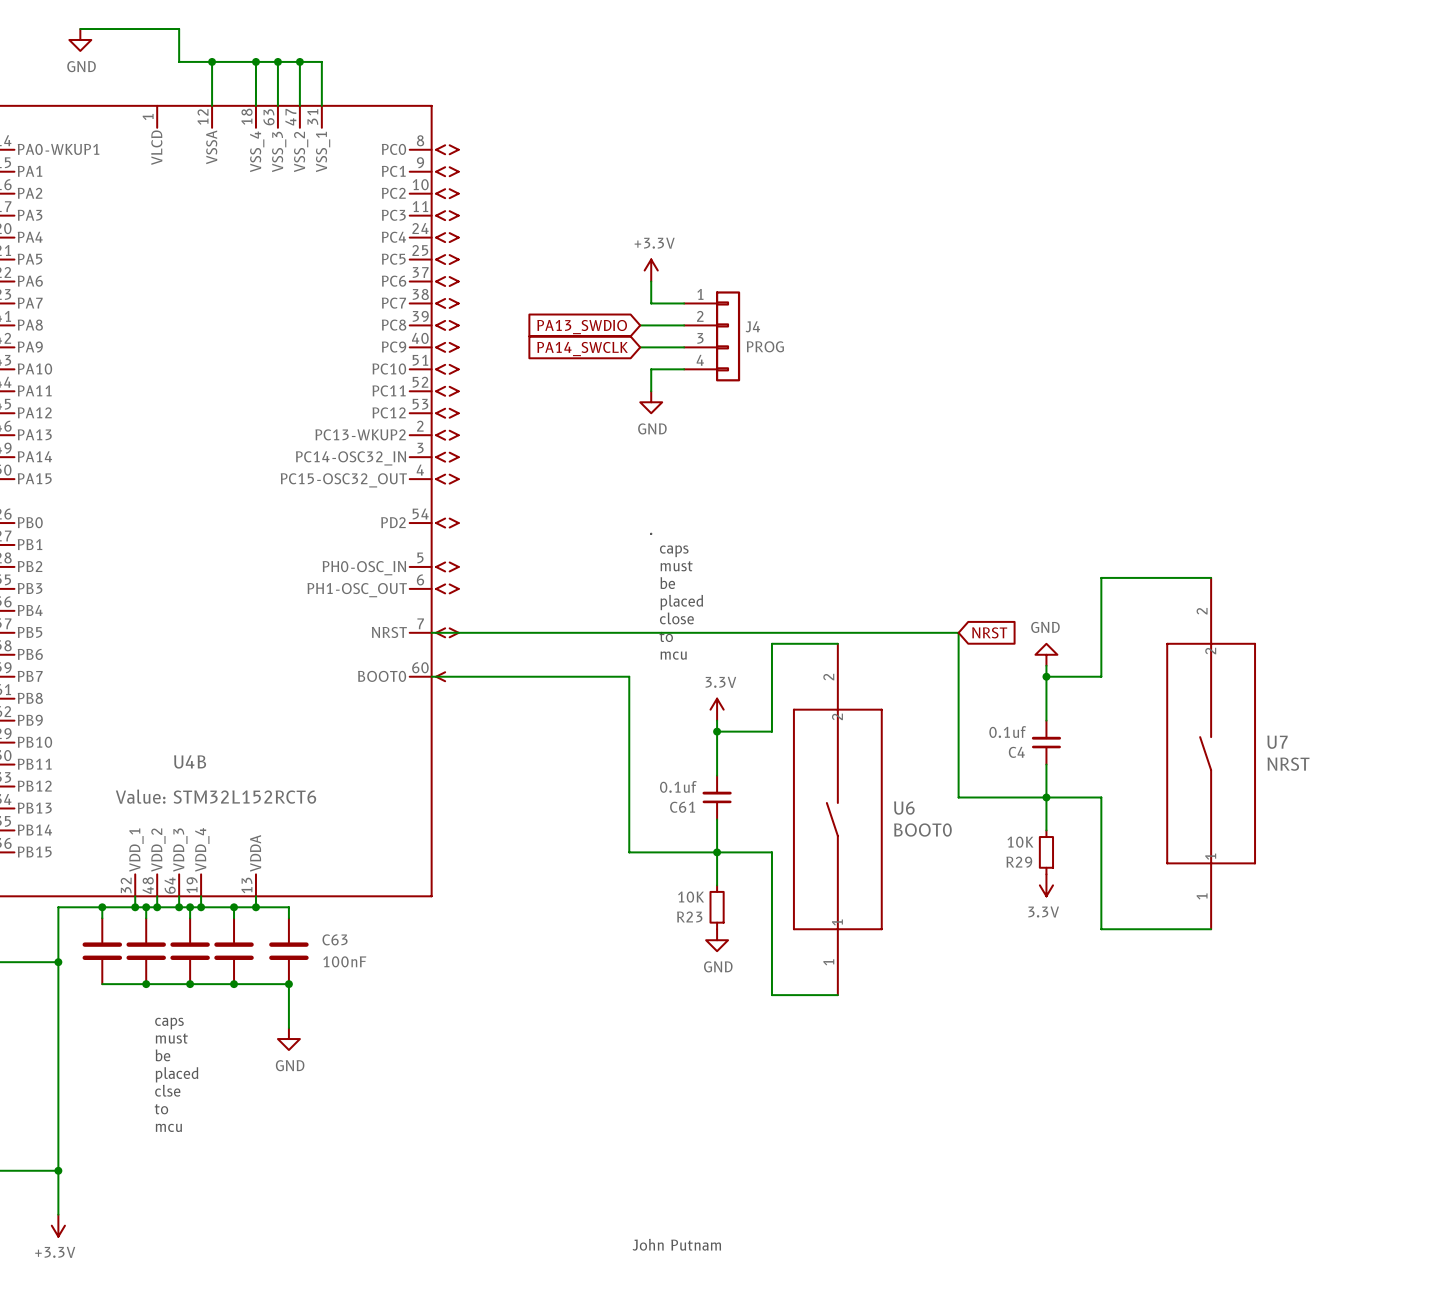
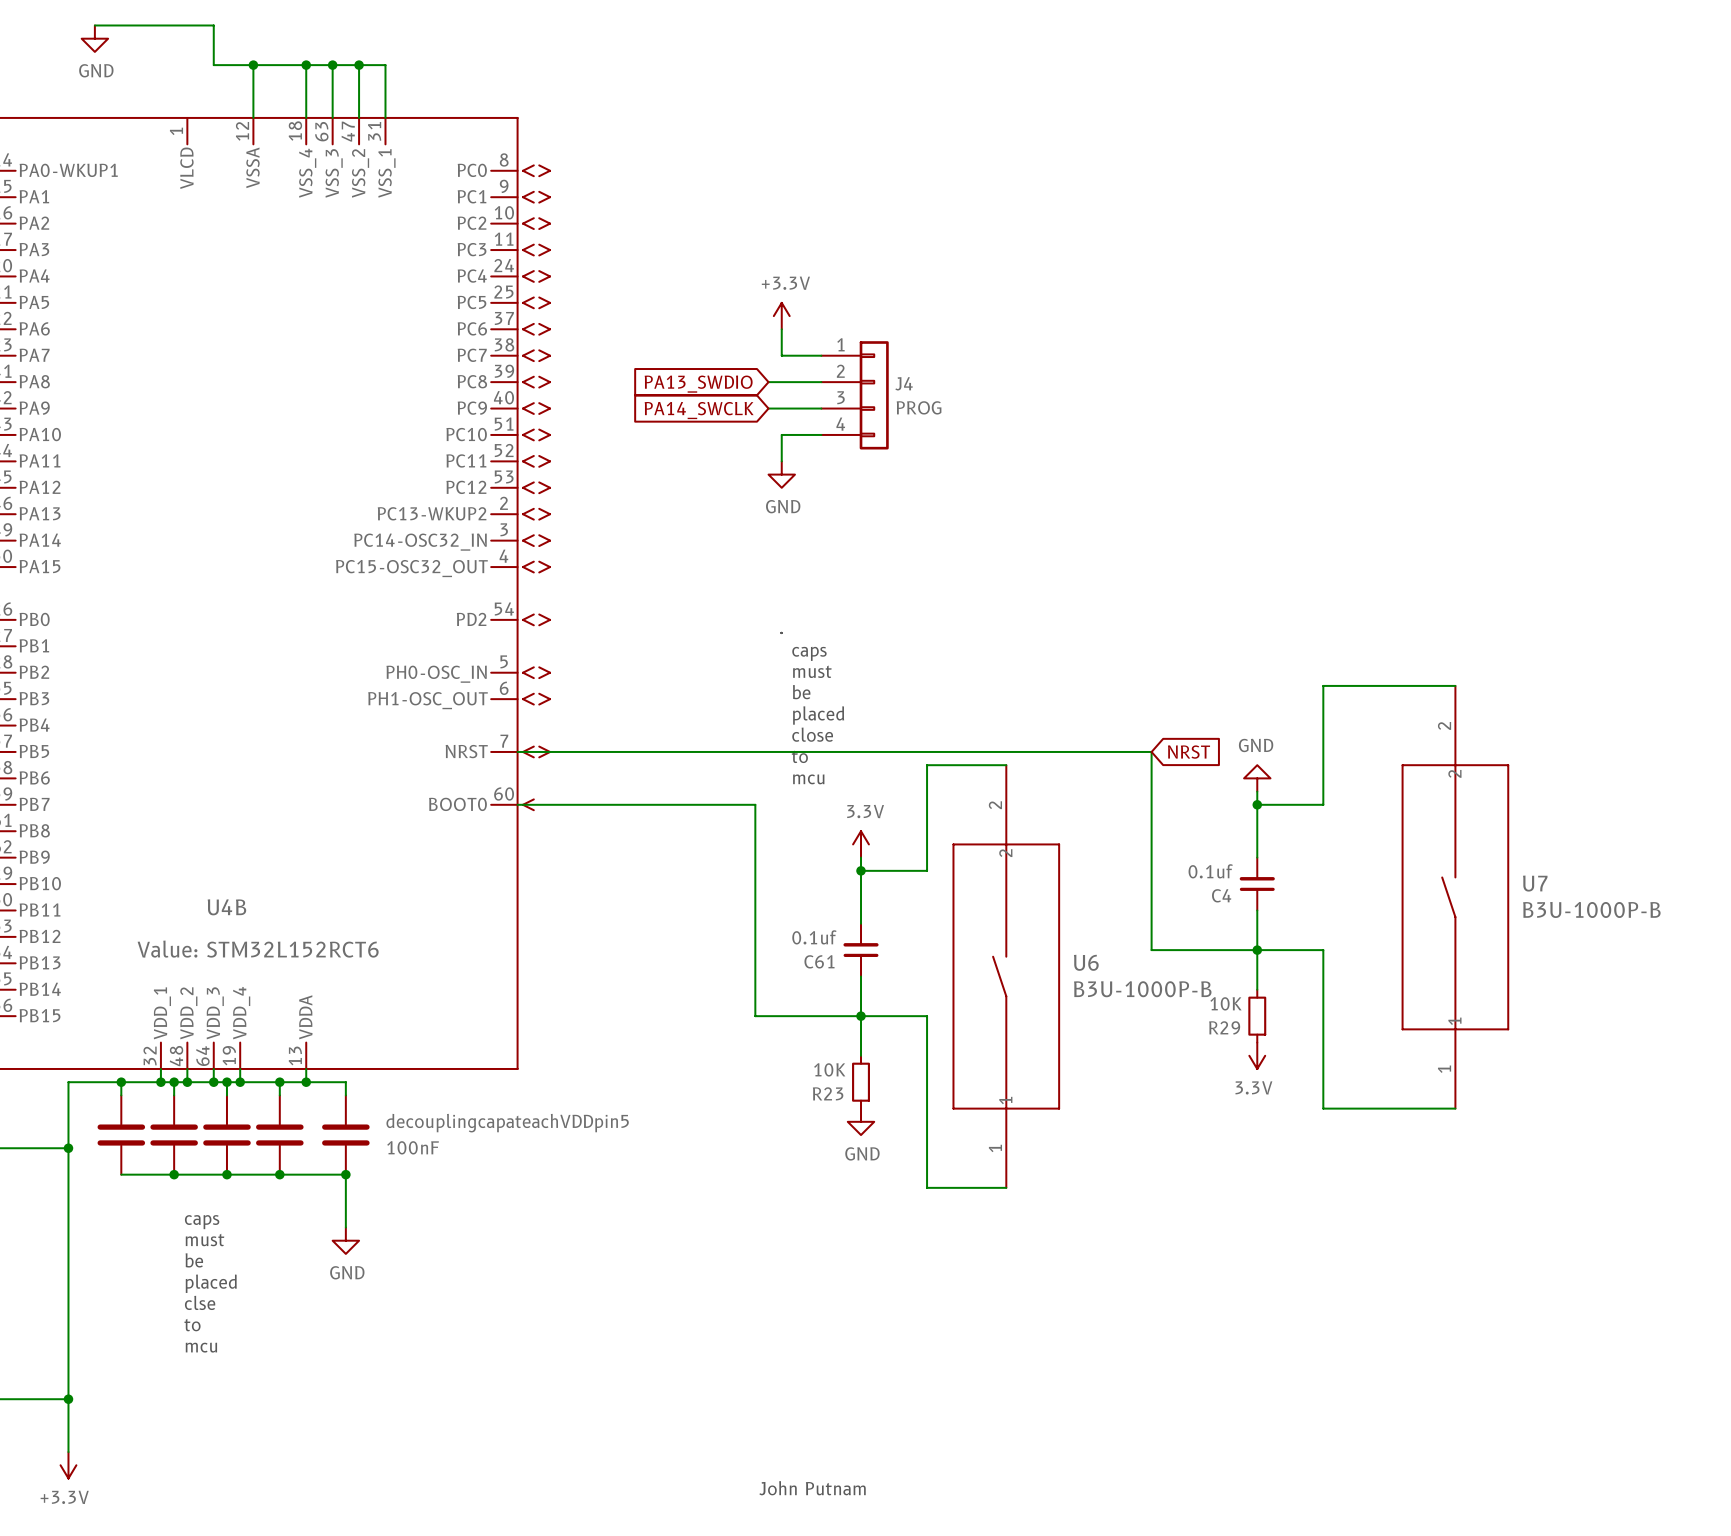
U7 value: NRST (1288, 764) -> B3U-1000P-B (1591, 909)
U6 value: BOOT0 (922, 830) -> B3U-1000P-B (1142, 989)
C63 name: C63 (335, 939) -> decouplingcapateachVDDpin5 (507, 1123)

